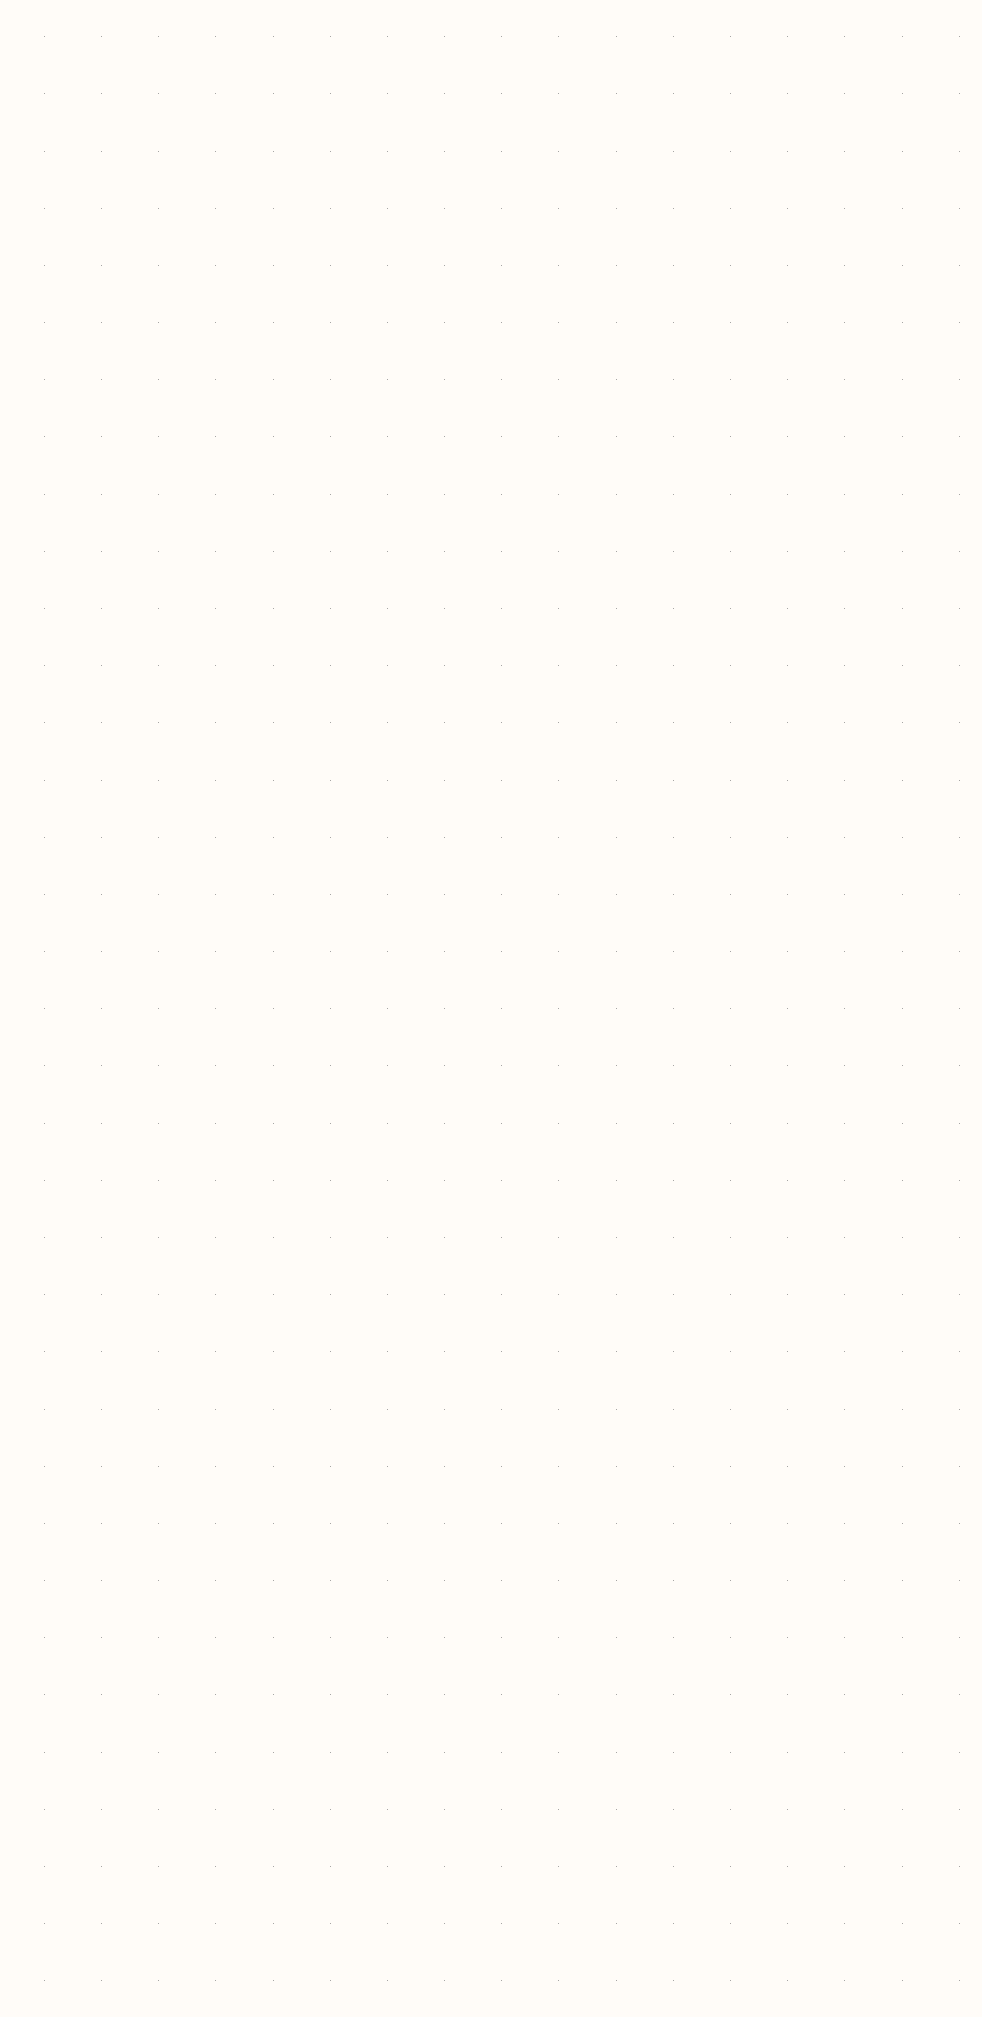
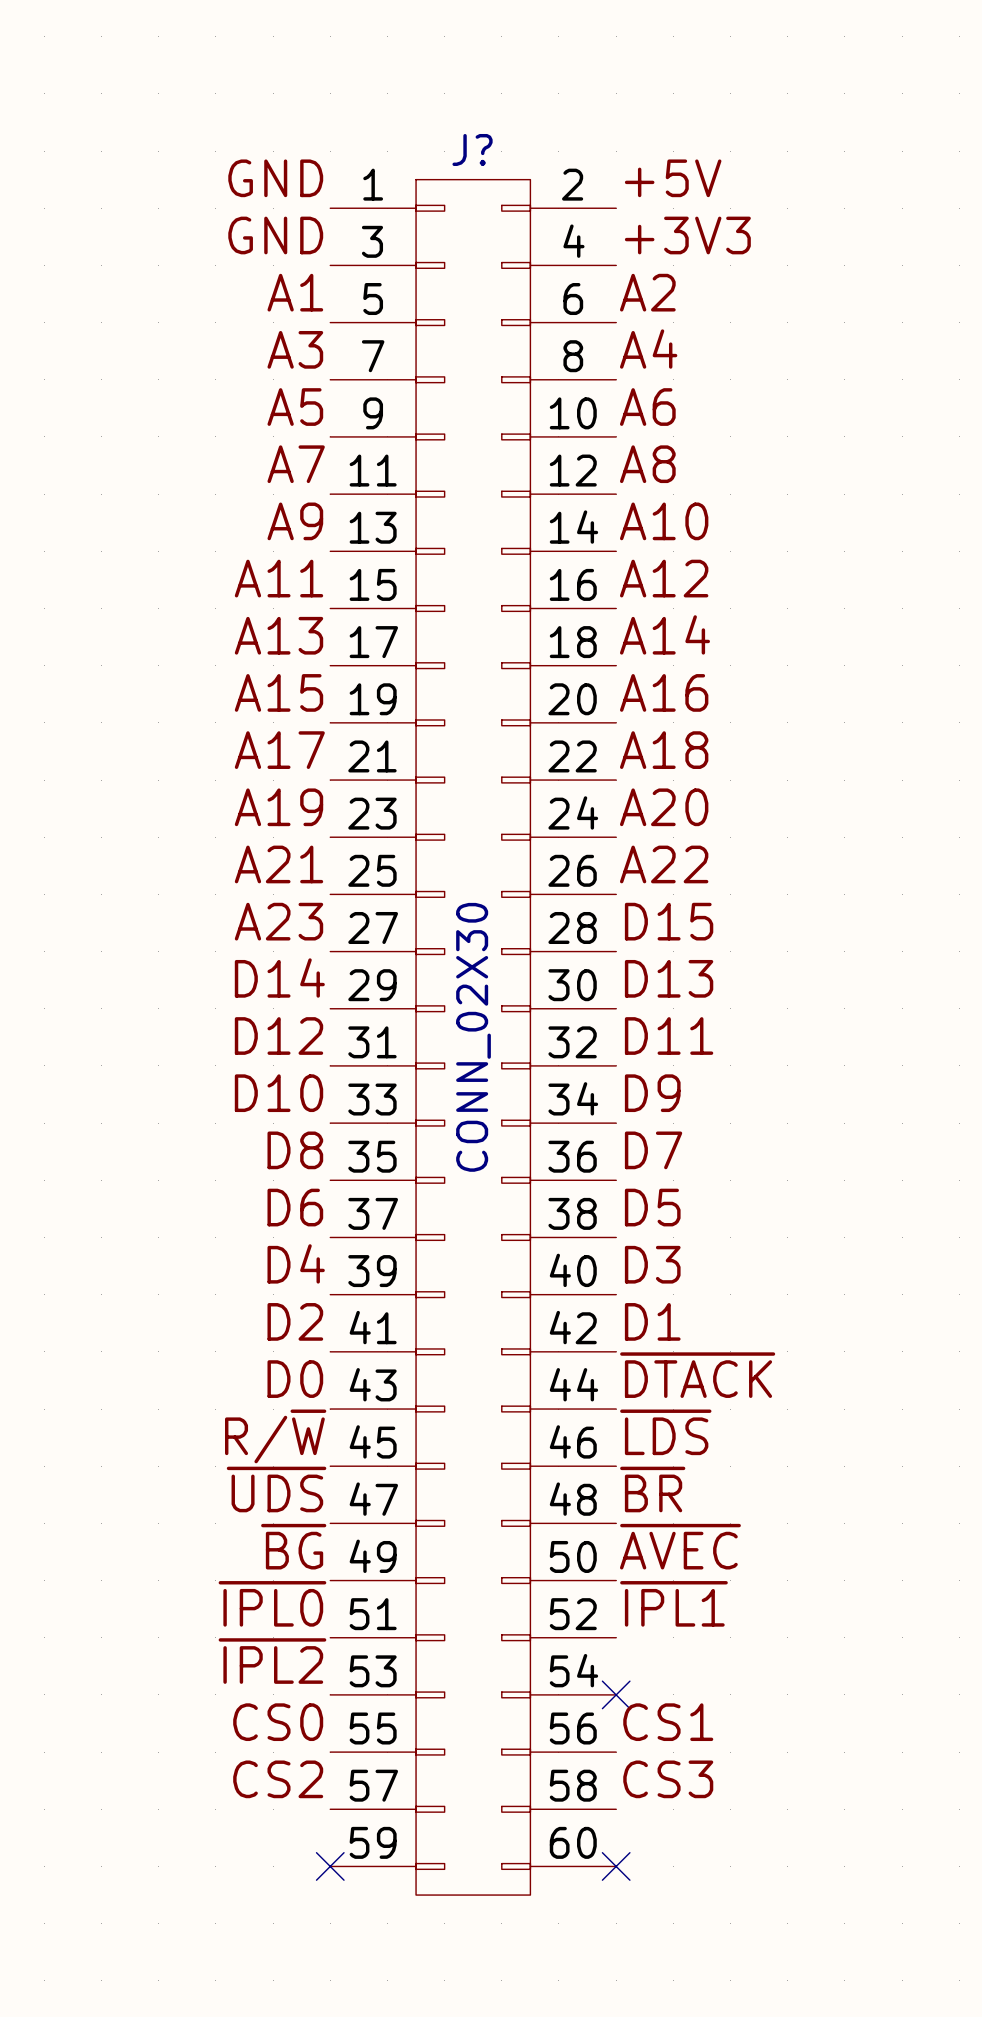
label: none -> GND (275, 178)
label: none -> +5V (673, 178)
label: none -> GND (275, 235)
label: none -> +3V3 (687, 235)
label: none -> A1 (295, 292)
label: none -> A2 (647, 292)
label: none -> A3 (295, 349)
label: none -> A4 (648, 349)
label: none -> A5 (295, 407)
label: none -> A6 (647, 407)
label: none -> A7 (296, 464)
label: none -> A8 (647, 464)
label: none -> A9 (295, 521)
label: none -> A10 (664, 521)
label: none -> A11 (279, 578)
label: none -> A12 (664, 578)
label: none -> A14 (664, 634)
label: none -> A13 (279, 635)
label: none -> A15 (279, 692)
label: none -> A16 (664, 692)
label: none -> A17 (279, 750)
label: none -> A18 (664, 750)
label: none -> A19 (279, 807)
label: none -> A20 (664, 807)
label: none -> A21 (279, 864)
label: none -> A22 (664, 864)
label: none -> A23 (279, 921)
label: none -> D15 (669, 921)
label: none -> D14 (279, 978)
label: none -> D13 (669, 978)
label: none -> D12 (279, 1036)
label: none -> D11 (669, 1036)
J?: none -> CONN_02X30 (473, 1037)
label: none -> D10 (279, 1093)
label: none -> D9 (652, 1093)
label: none -> D8 (295, 1150)
label: none -> D7 (653, 1150)
label: none -> D6 (295, 1207)
label: none -> D5 (652, 1207)
label: none -> D4 (296, 1263)
label: none -> D3 (652, 1264)
label: none -> D2 (295, 1321)
label: none -> D1 (652, 1321)
label: none -> ~{DTACK} (697, 1375)
label: none -> D0 (295, 1379)
label: none -> ~{LDS} (665, 1432)
label: none -> R/~{W} (275, 1436)
label: none -> ~{UDS} (276, 1489)
label: none -> ~{BR} (652, 1489)
label: none -> ~{BG} (293, 1546)
label: none -> ~{AVEC} (680, 1546)
label: none -> ~{IPL0} (272, 1603)
label: none -> ~{IPL1} (673, 1603)
label: none -> ~{IPL2} (272, 1661)
no-connect mark: none -> (616, 1694)
label: none -> CS0 (278, 1722)
label: none -> CS1 (668, 1722)
label: none -> CS2 (278, 1779)
label: none -> CS3 (668, 1779)
no-connect mark: none -> (330, 1866)
no-connect mark: none -> (616, 1866)

